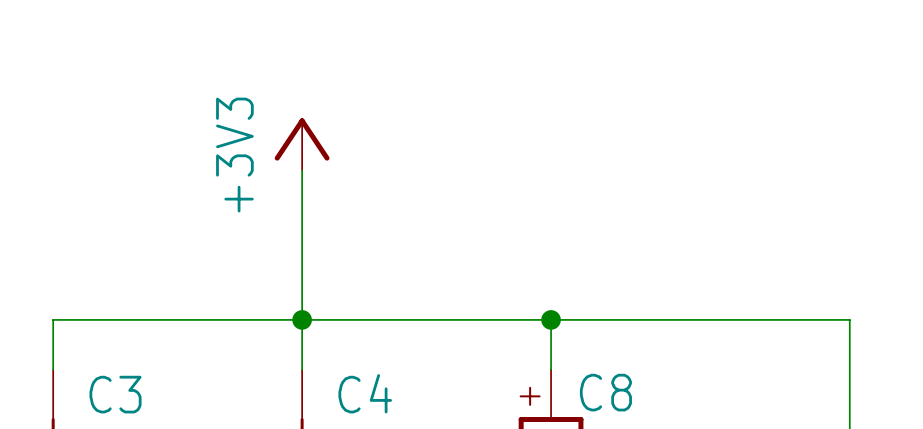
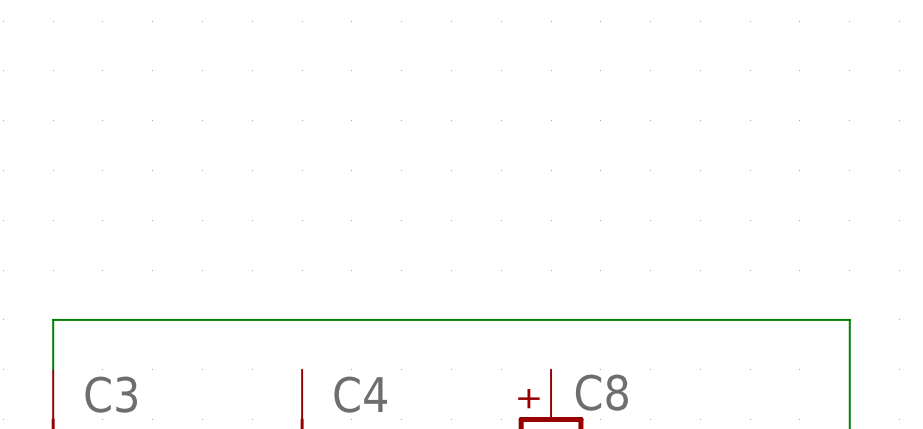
power symbol: +3V3 (302, 144) -> none
wire: (302, 170) (302, 369) -> none
junction: (302, 319) -> none
wire: (551, 319) (551, 369) -> none
junction: (551, 319) -> none

